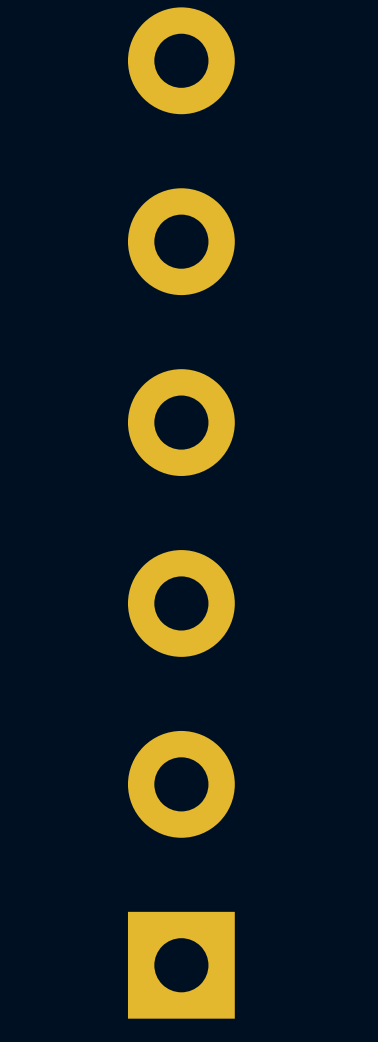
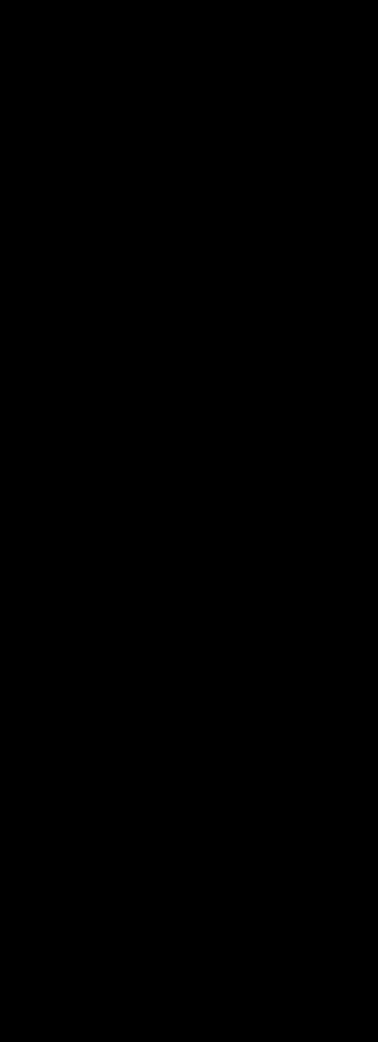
part: (181, 513) -> none

